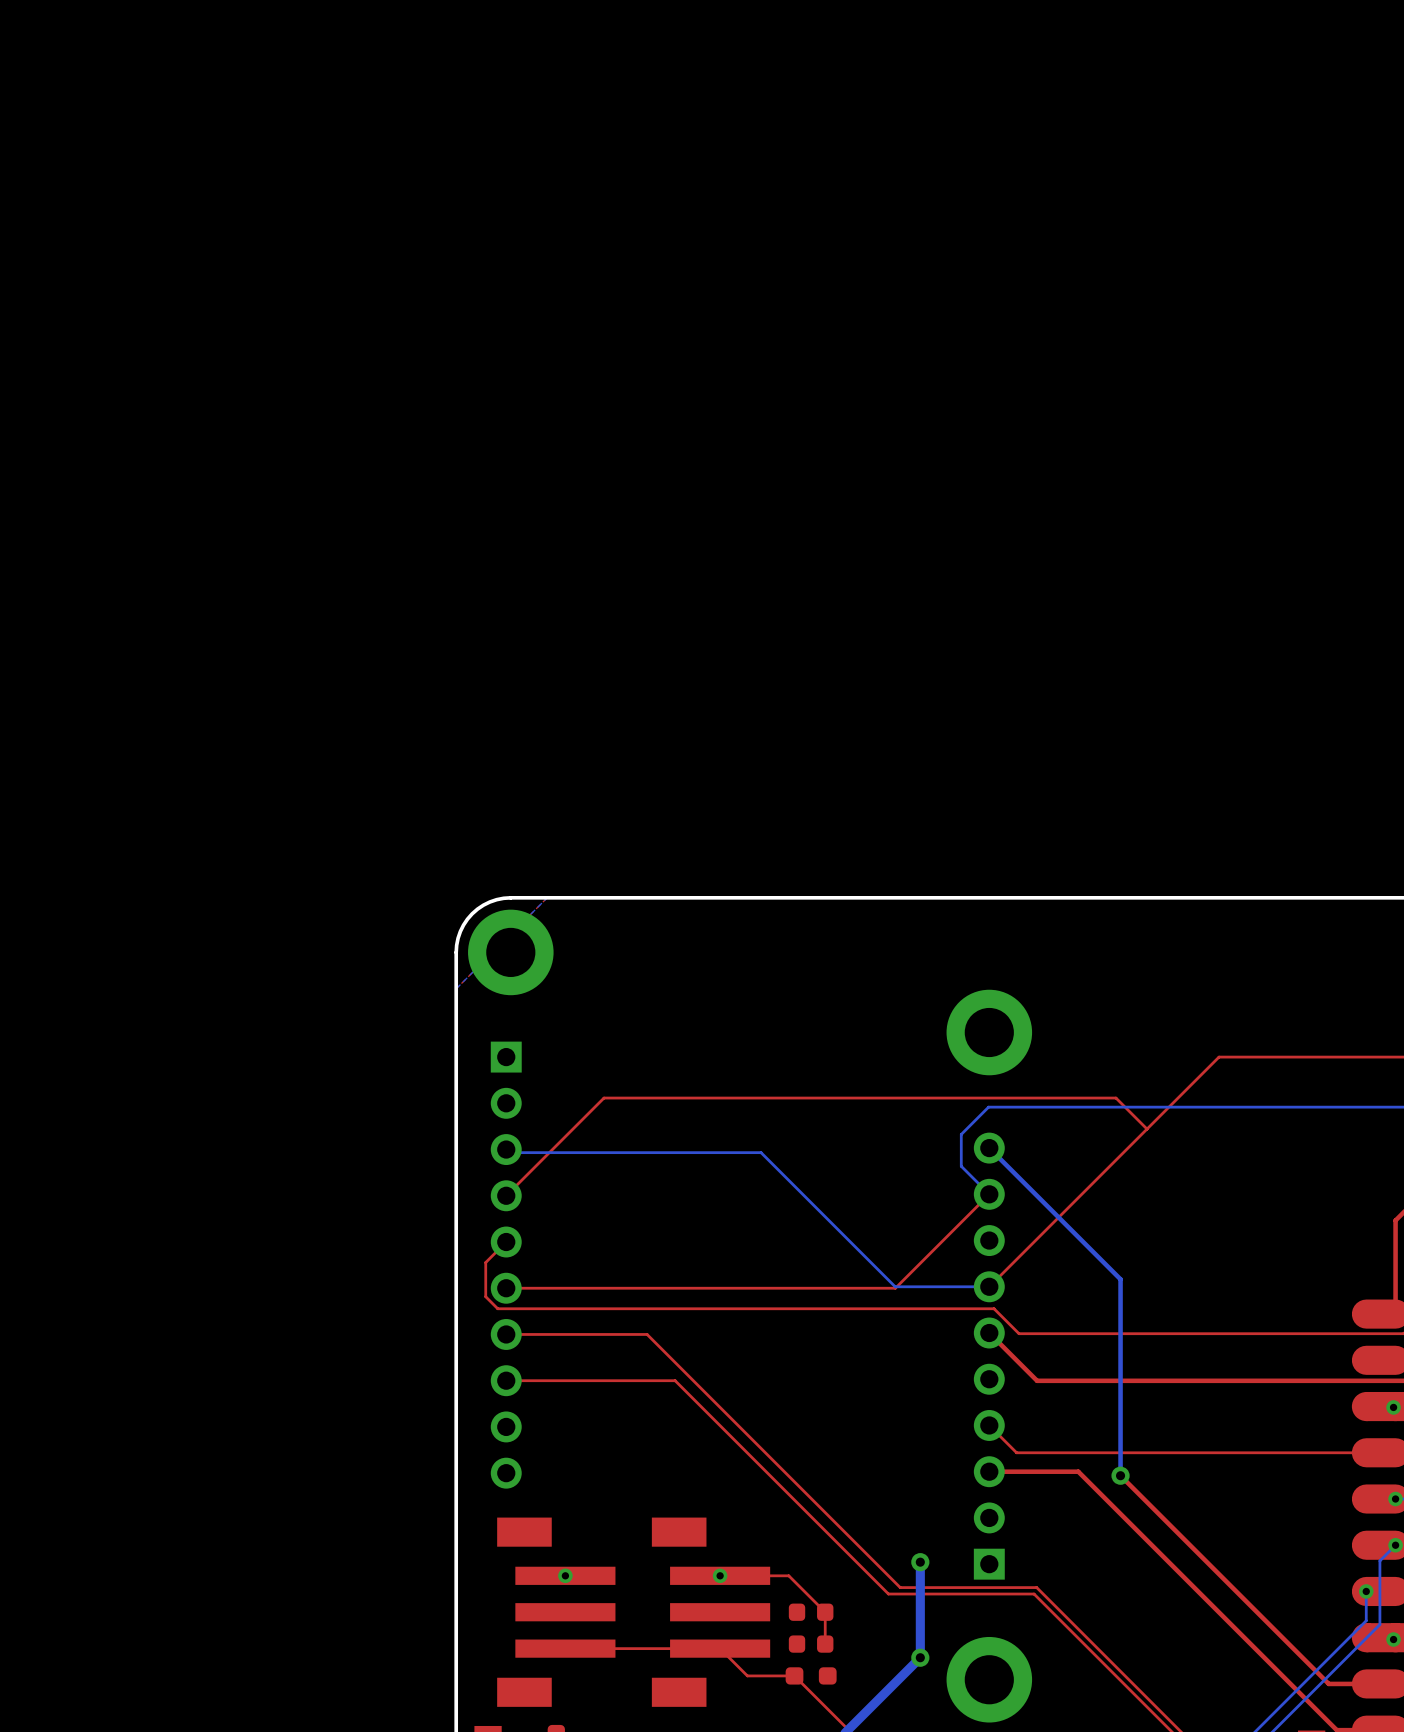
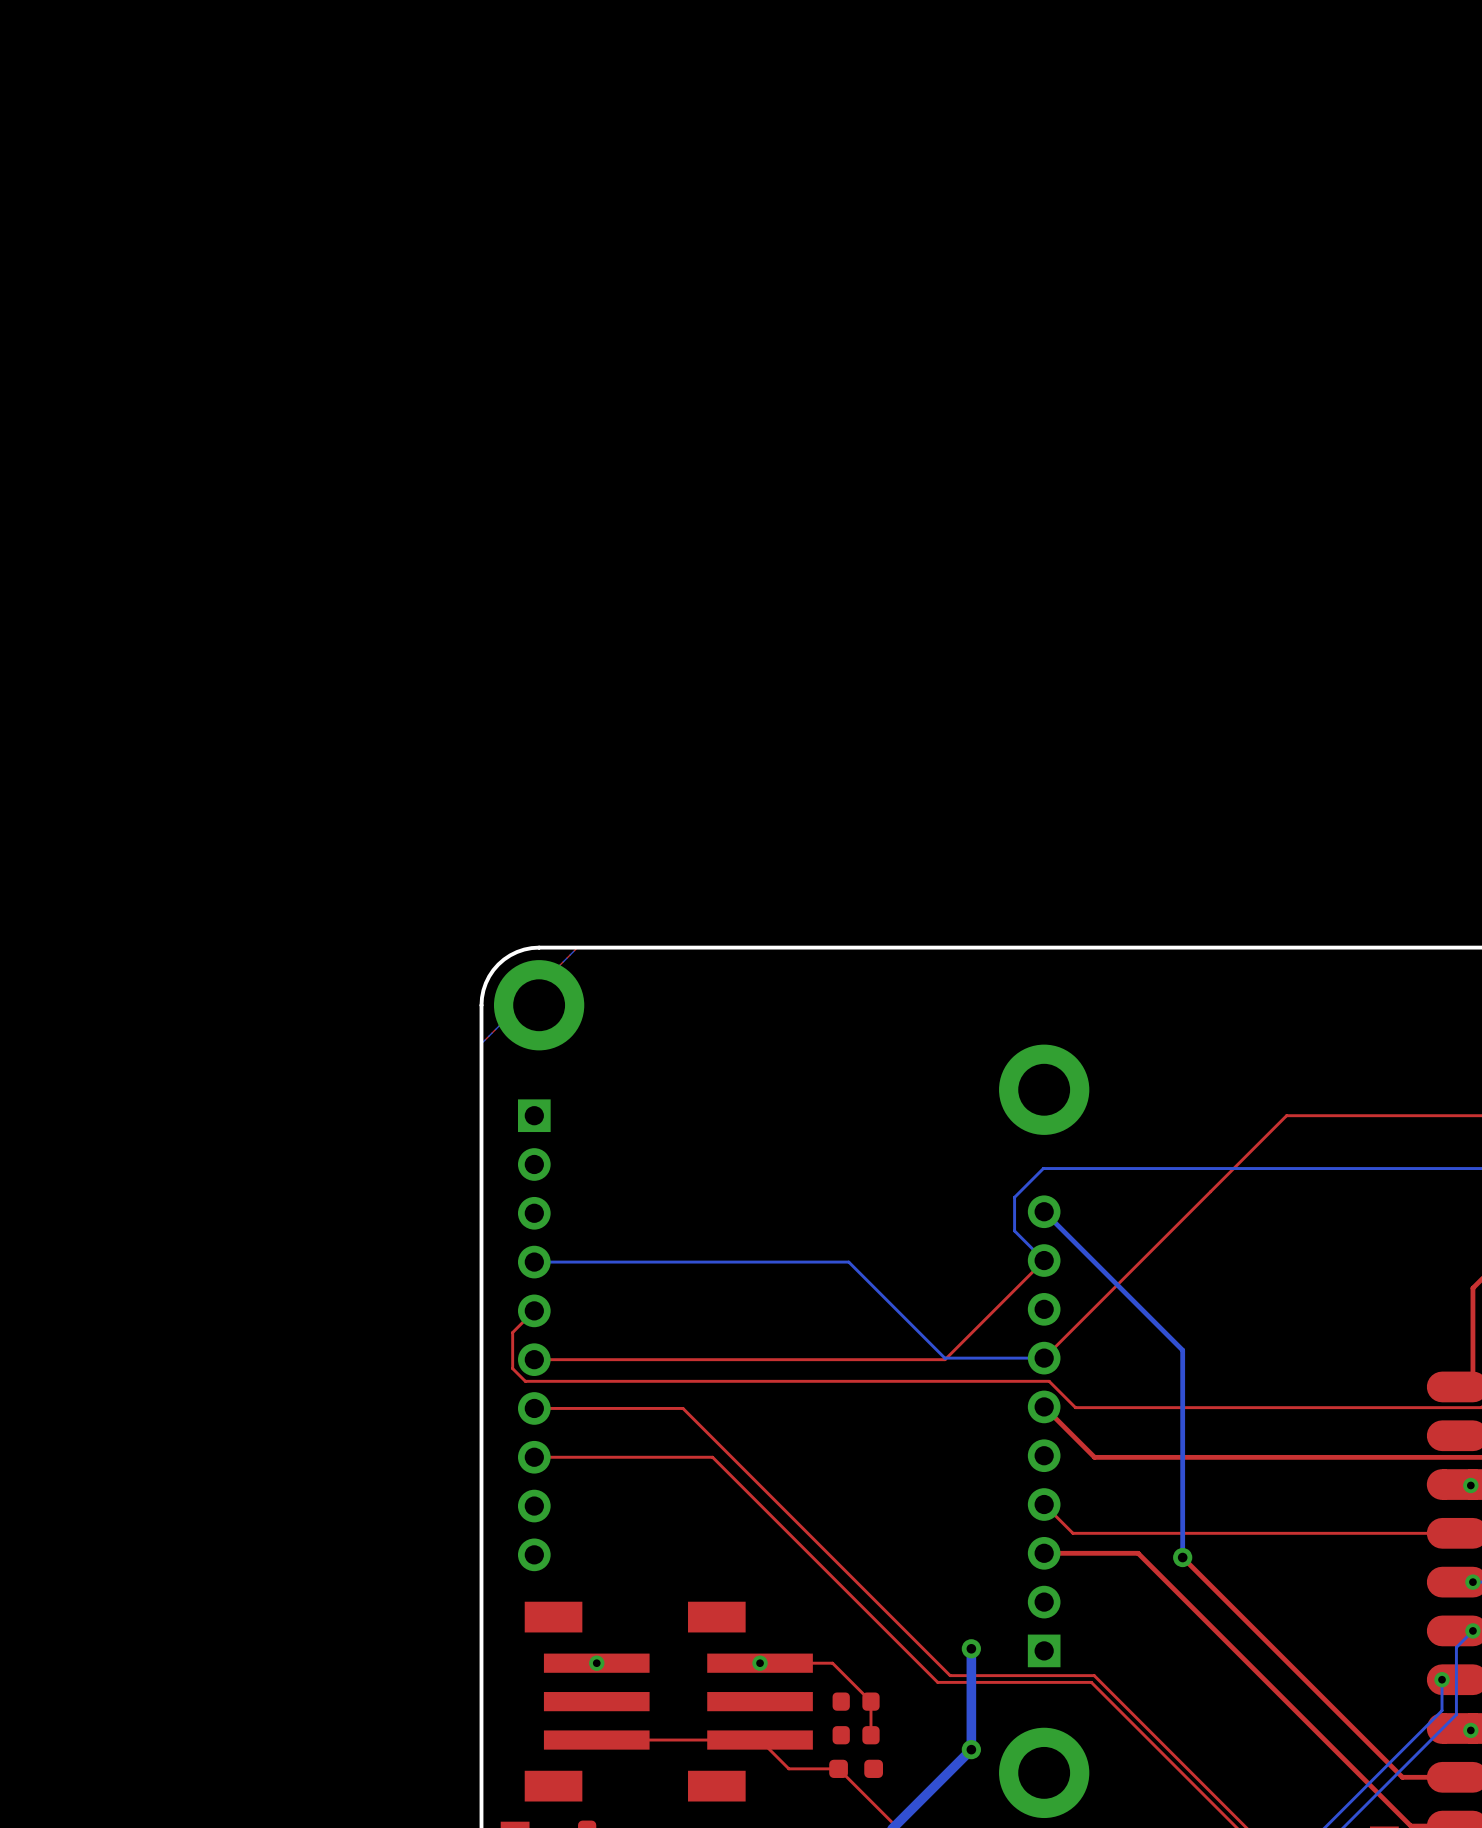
top track: (1147, 1129) (1115, 1098) (603, 1098) (506, 1195) -> none
bottom track: (509, 1152) (761, 1152) (804, 1195) -> (534, 1262) (848, 1262)

